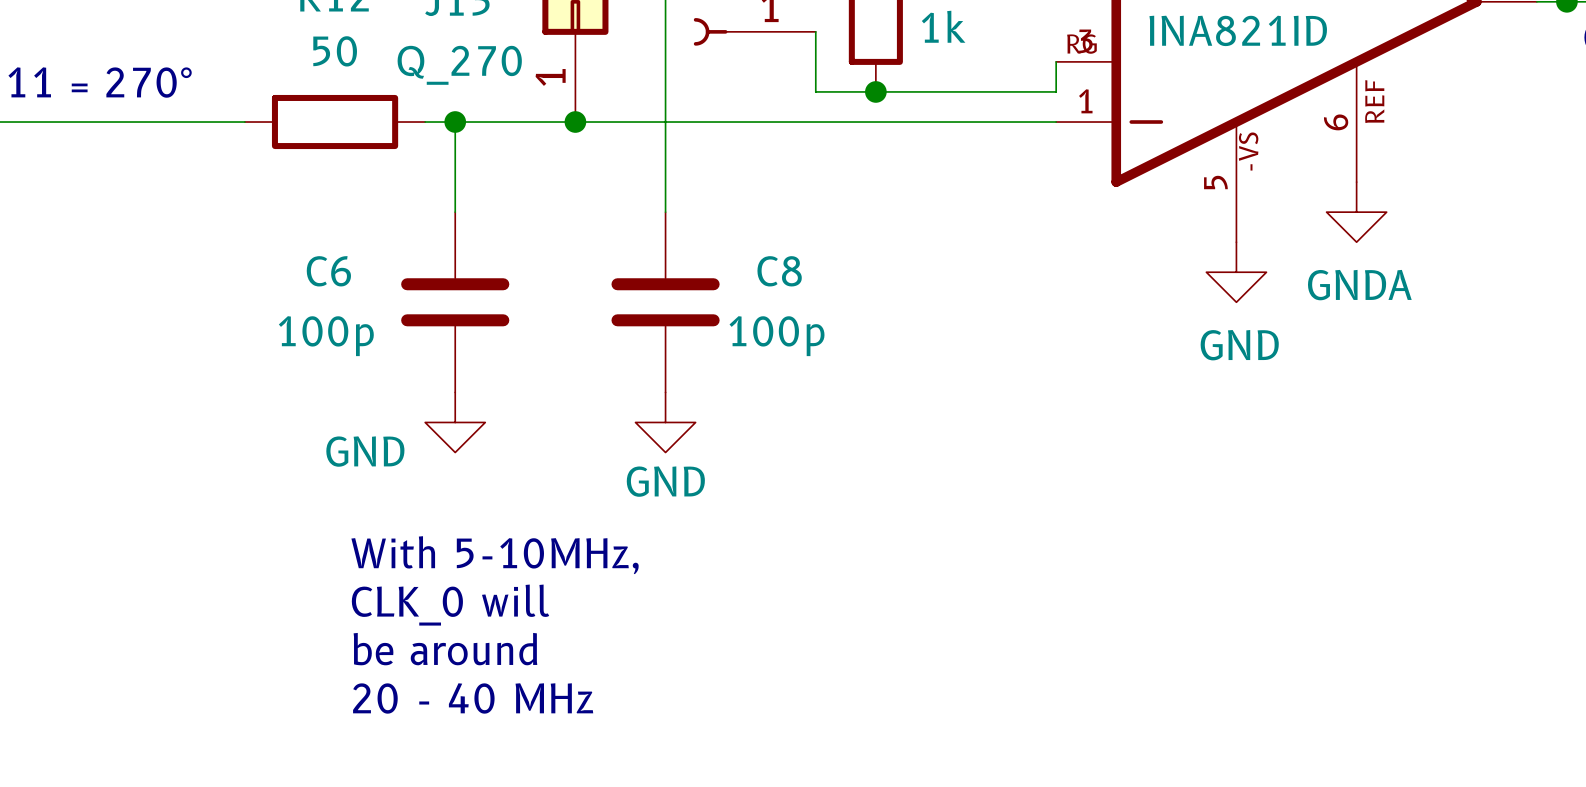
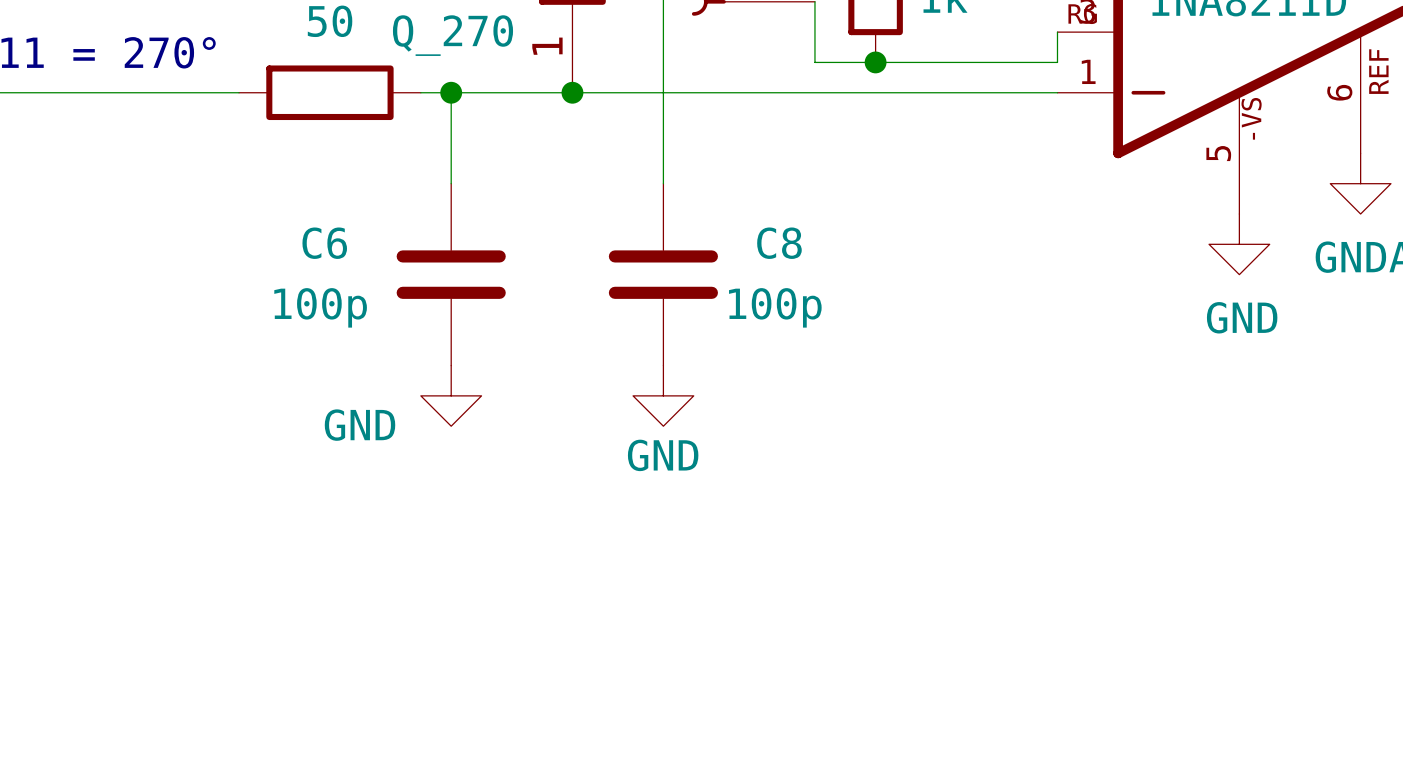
text: With 5-10MHz, (495, 555) -> none
text: CLK_0 will (450, 605) -> none
text: be around (445, 649) -> none
text: 20 - 40 MHz (473, 698) -> none

